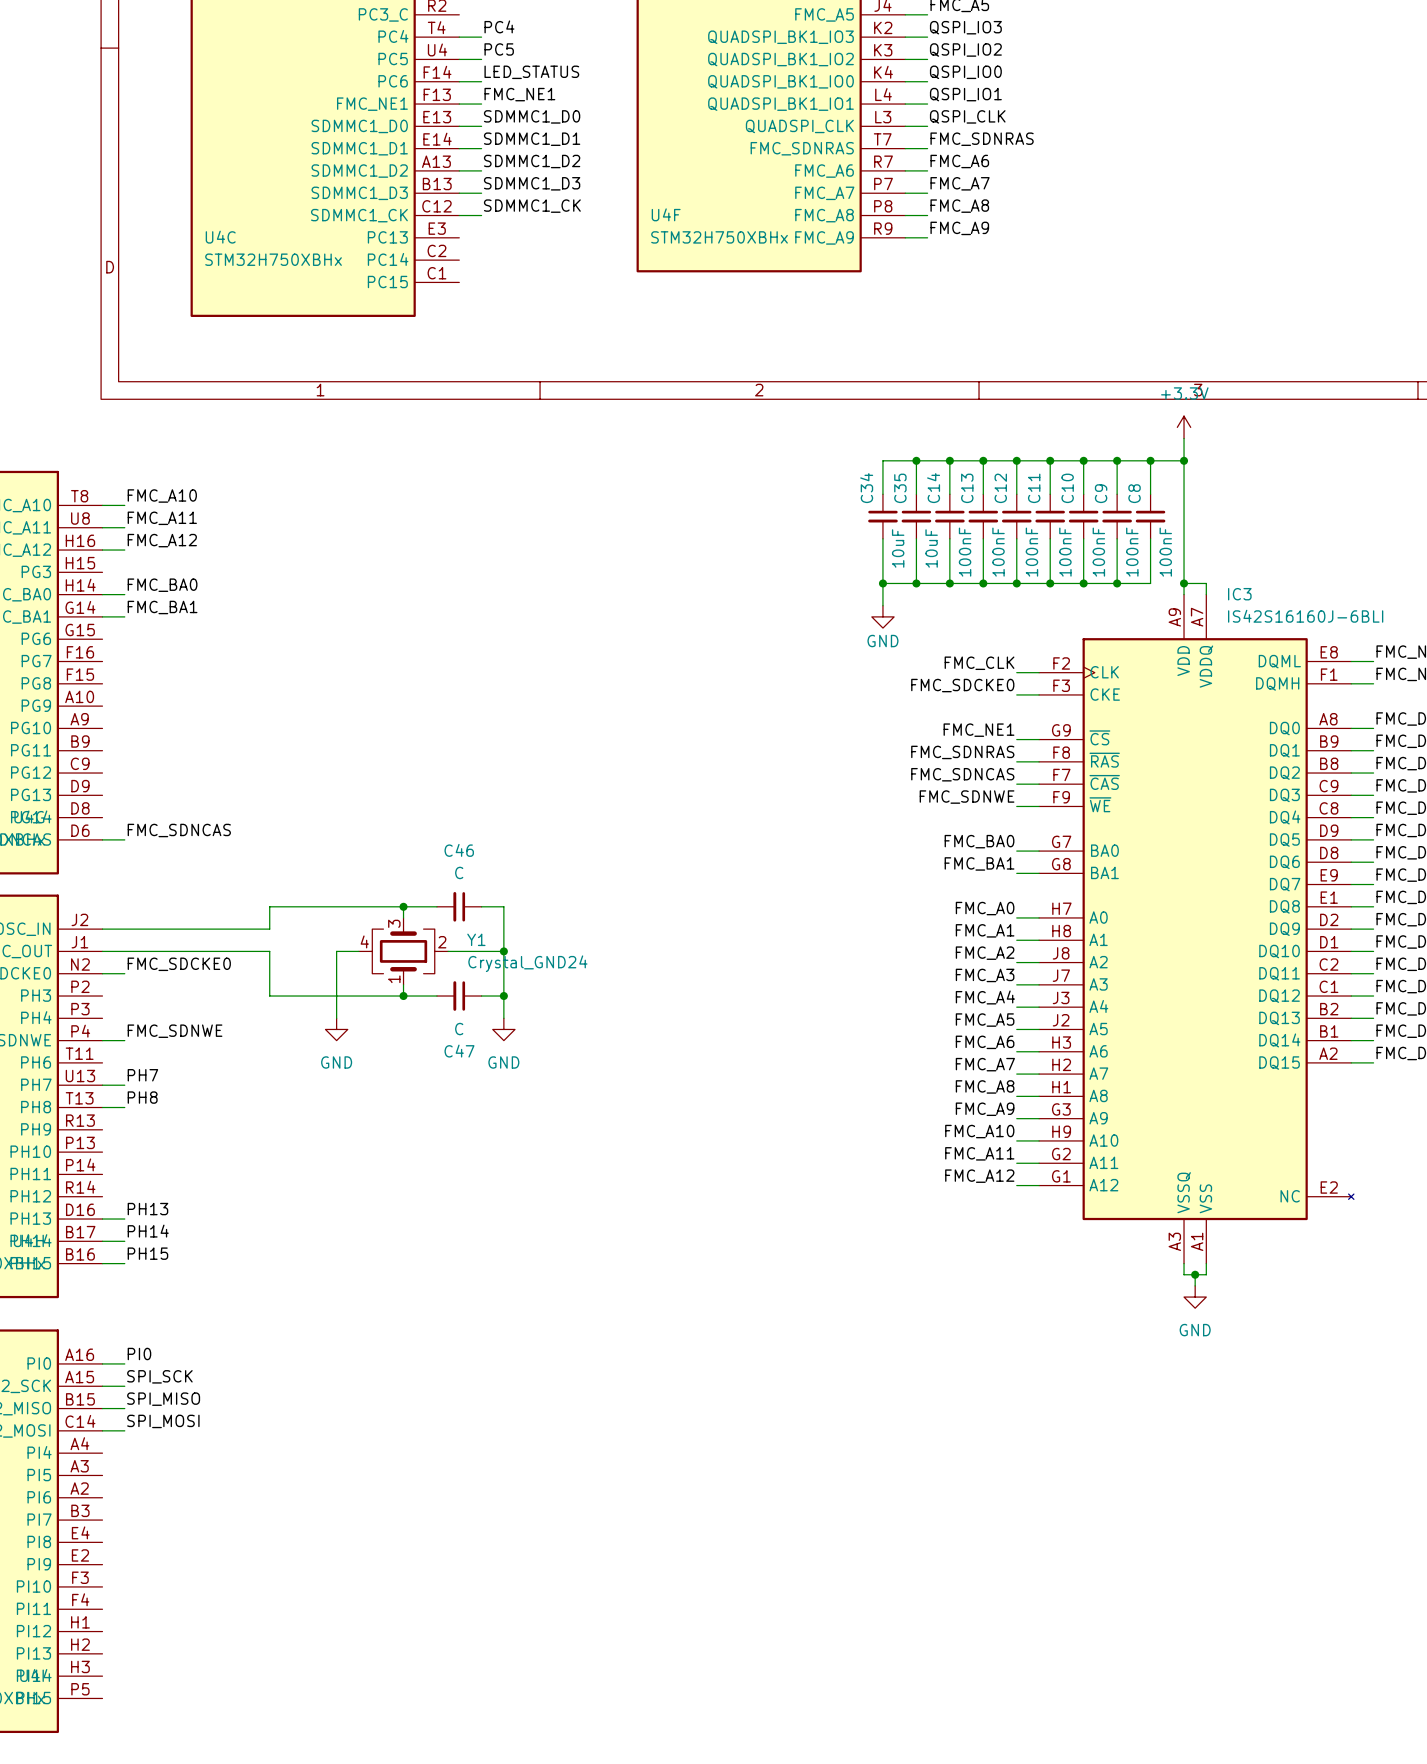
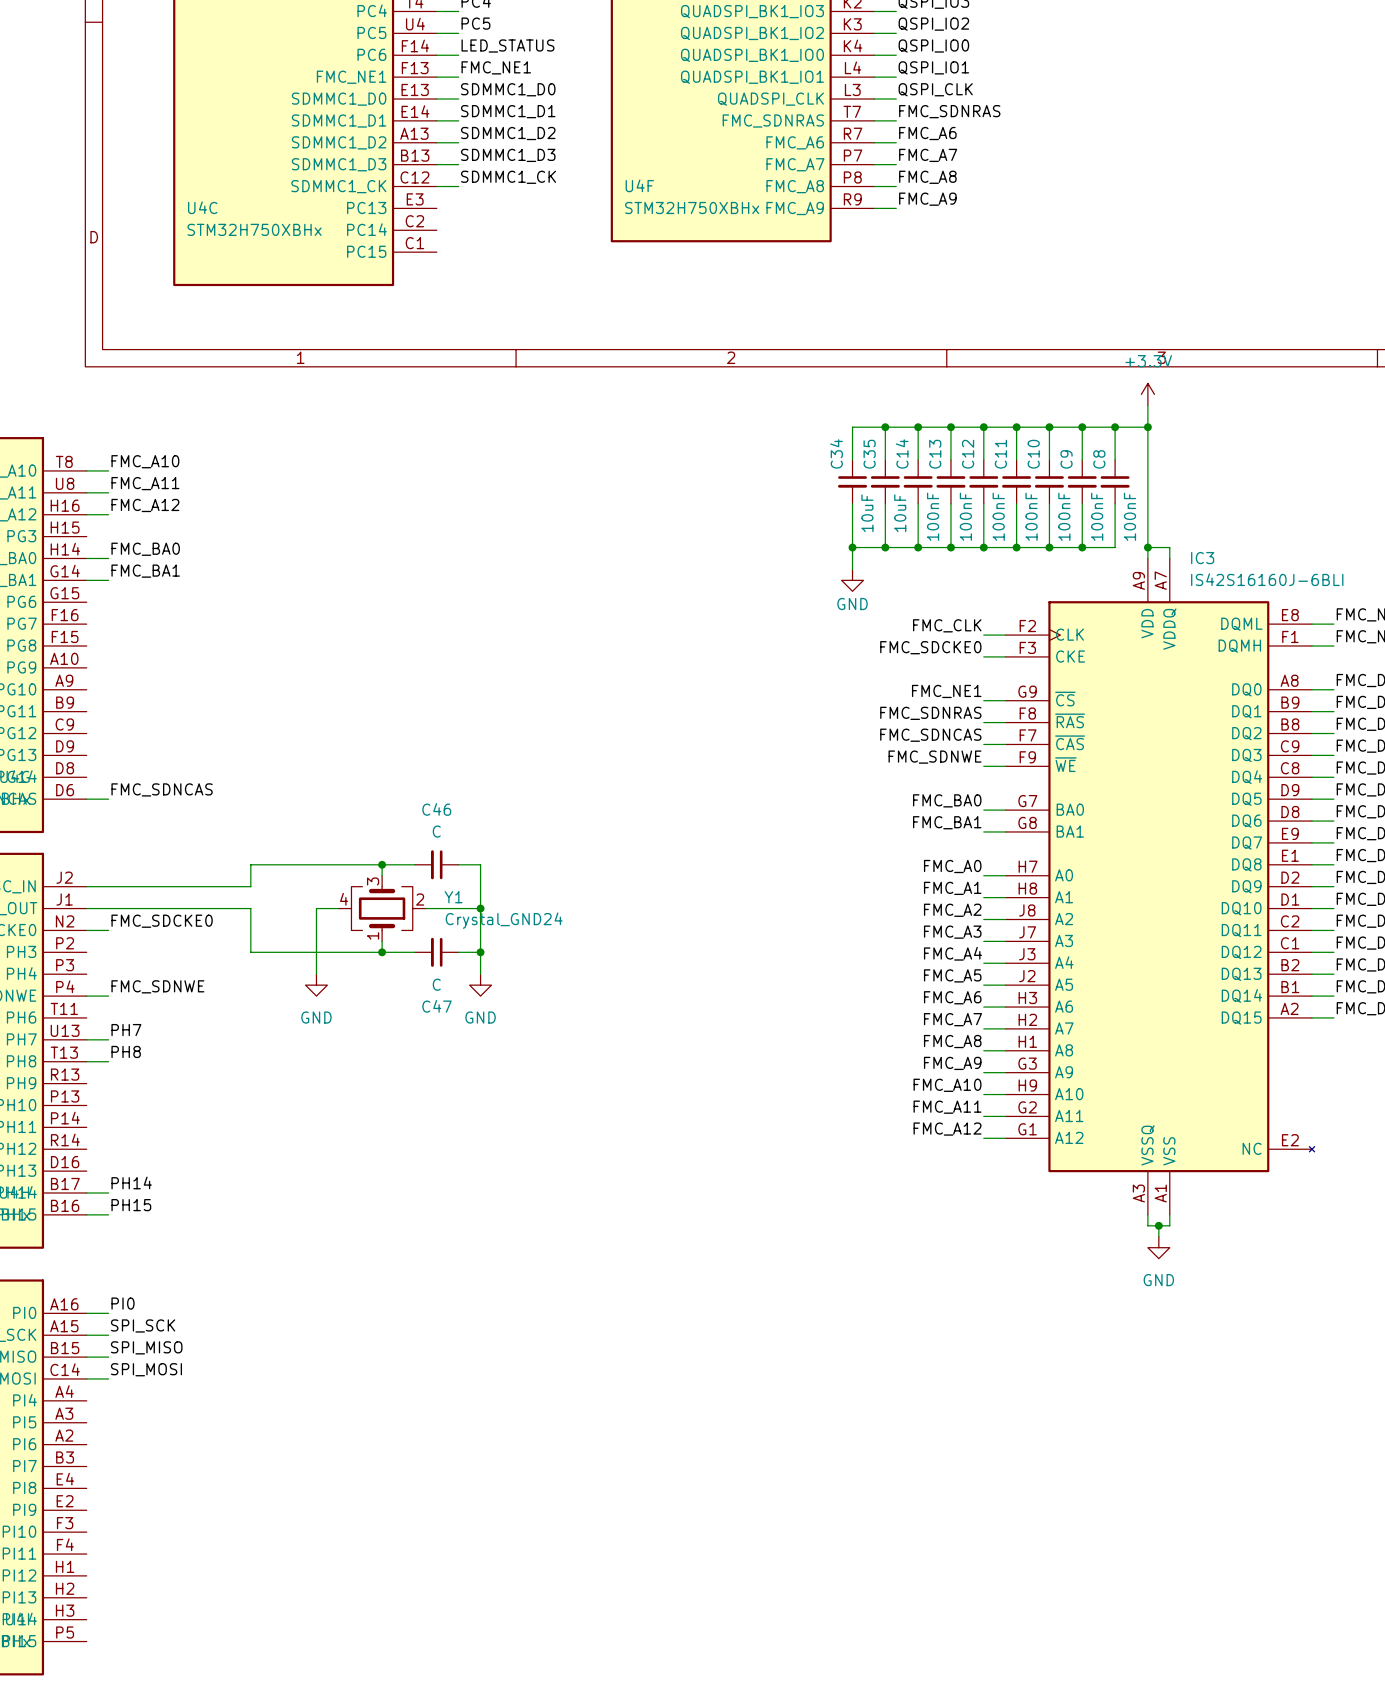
label: PH13 (147, 1209) -> none
wire: (102, 1219) (124, 1219) -> none

